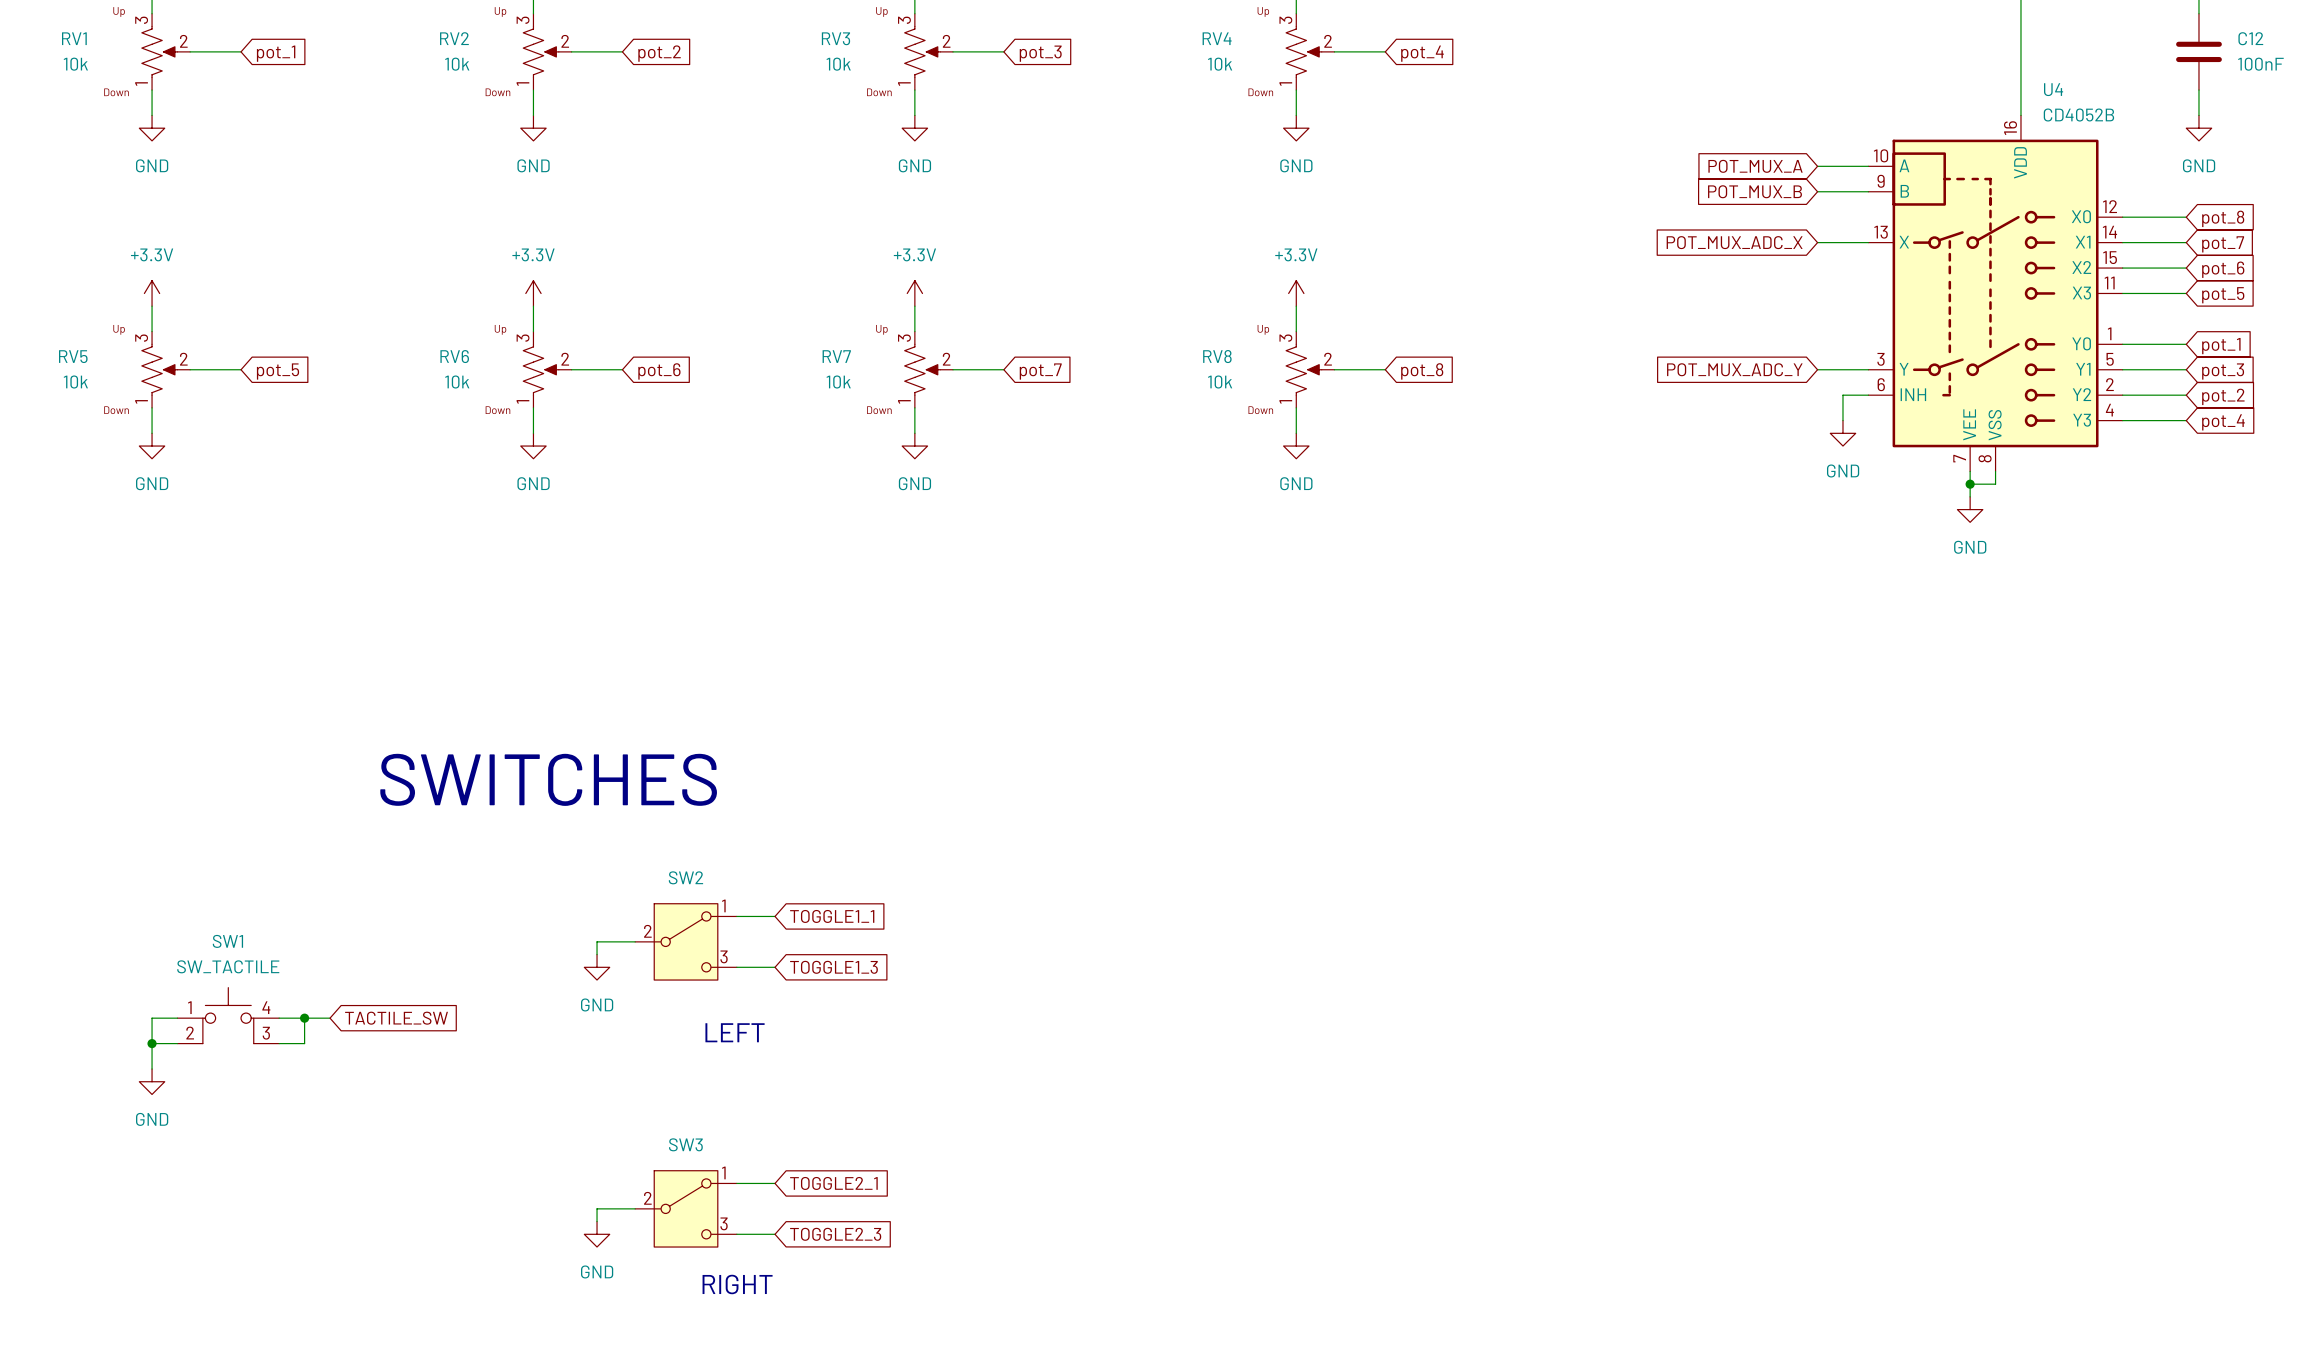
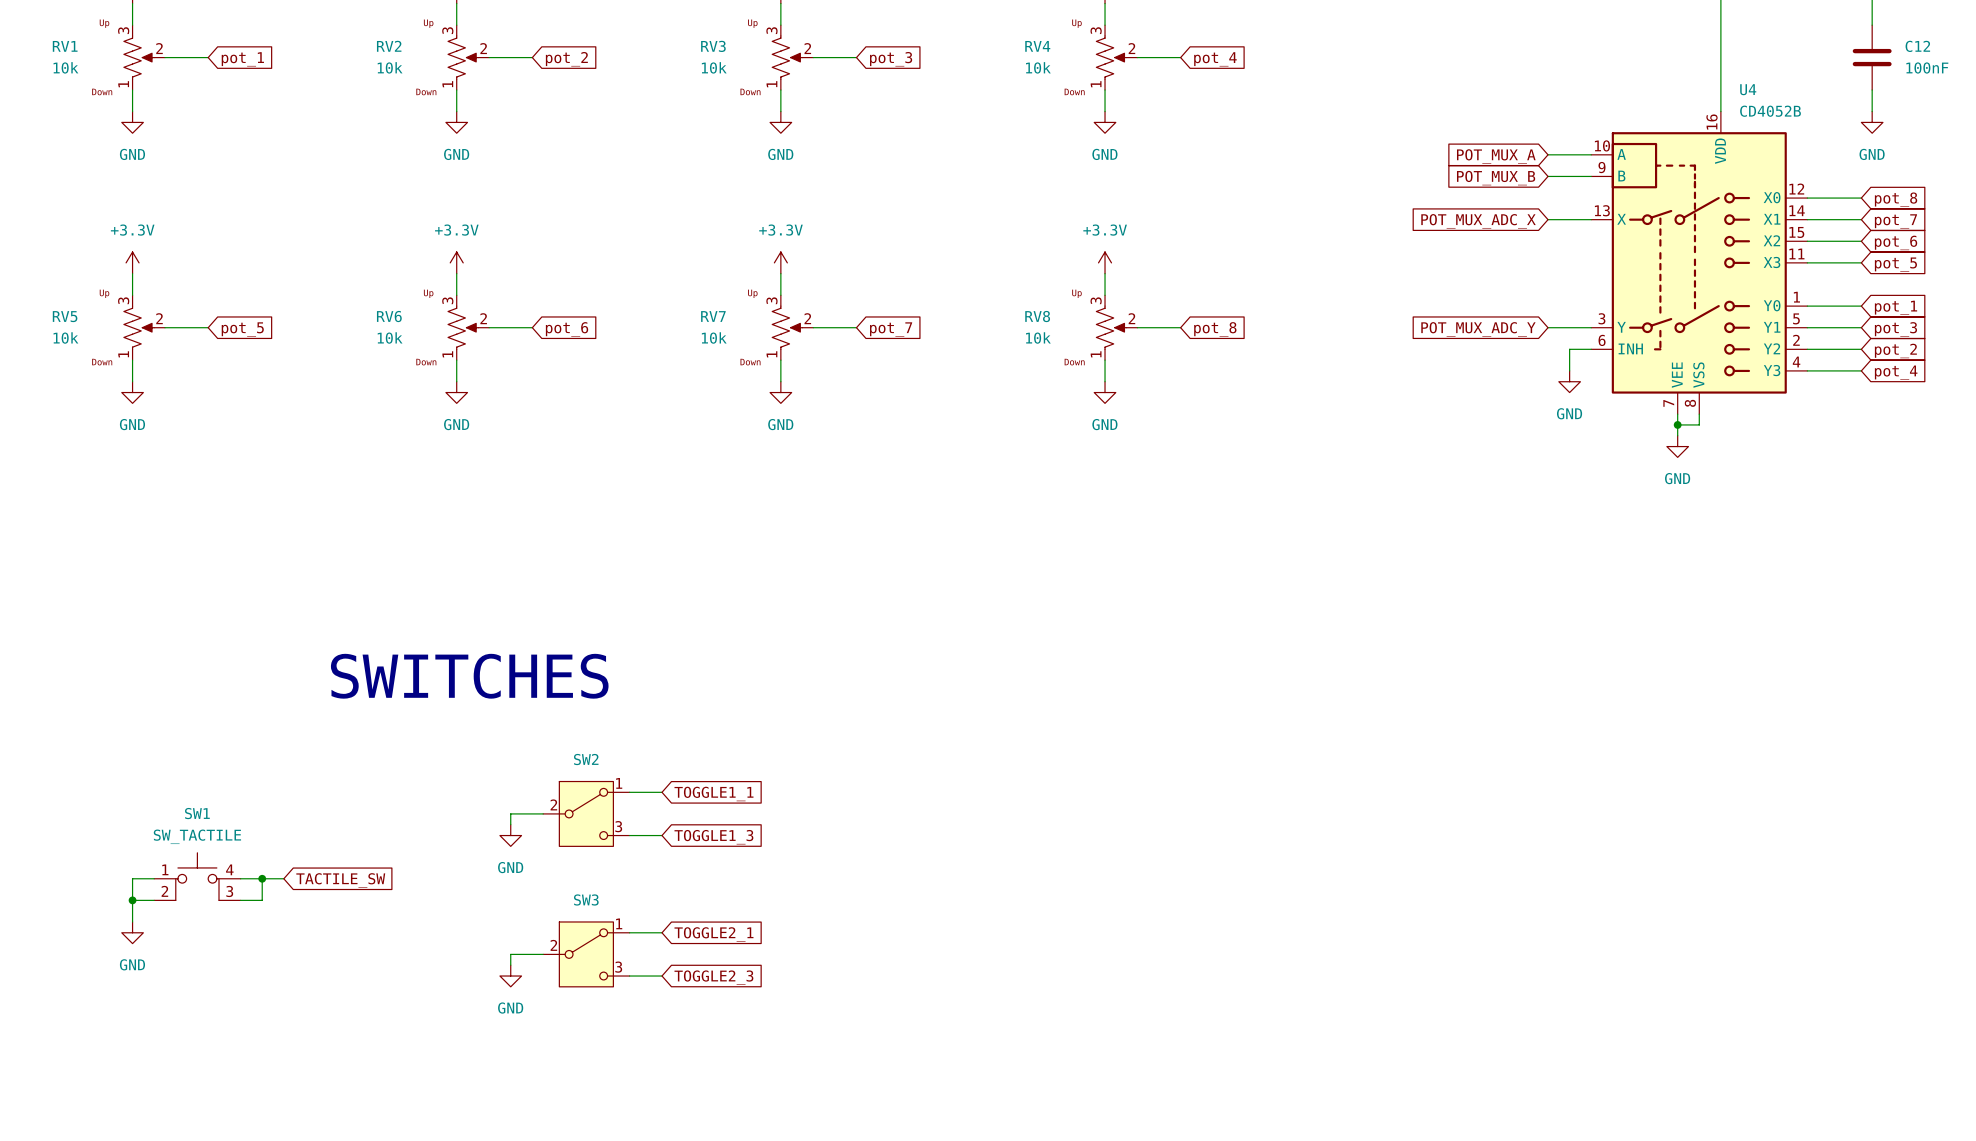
text: LEFT (735, 1032) -> none
wire: (736, 1183) (775, 1183) -> (629, 976) (662, 976)
global label position: TOGGLE2_1 (833, 1183) -> TOGGLE2_1 (713, 934)
wire: (635, 1208) (597, 1208) (597, 1221) -> (543, 954) (510, 954) (510, 965)
SW3 position: (686, 1208) -> (586, 954)
power symbol position: GND (597, 1234) -> GND (510, 976)
wire: (736, 1234) (775, 1234) -> (629, 932) (662, 932)
global label position: TOGGLE2_3 (835, 1234) -> TOGGLE2_3 (713, 977)
text: RIGHT (737, 1284) -> none

